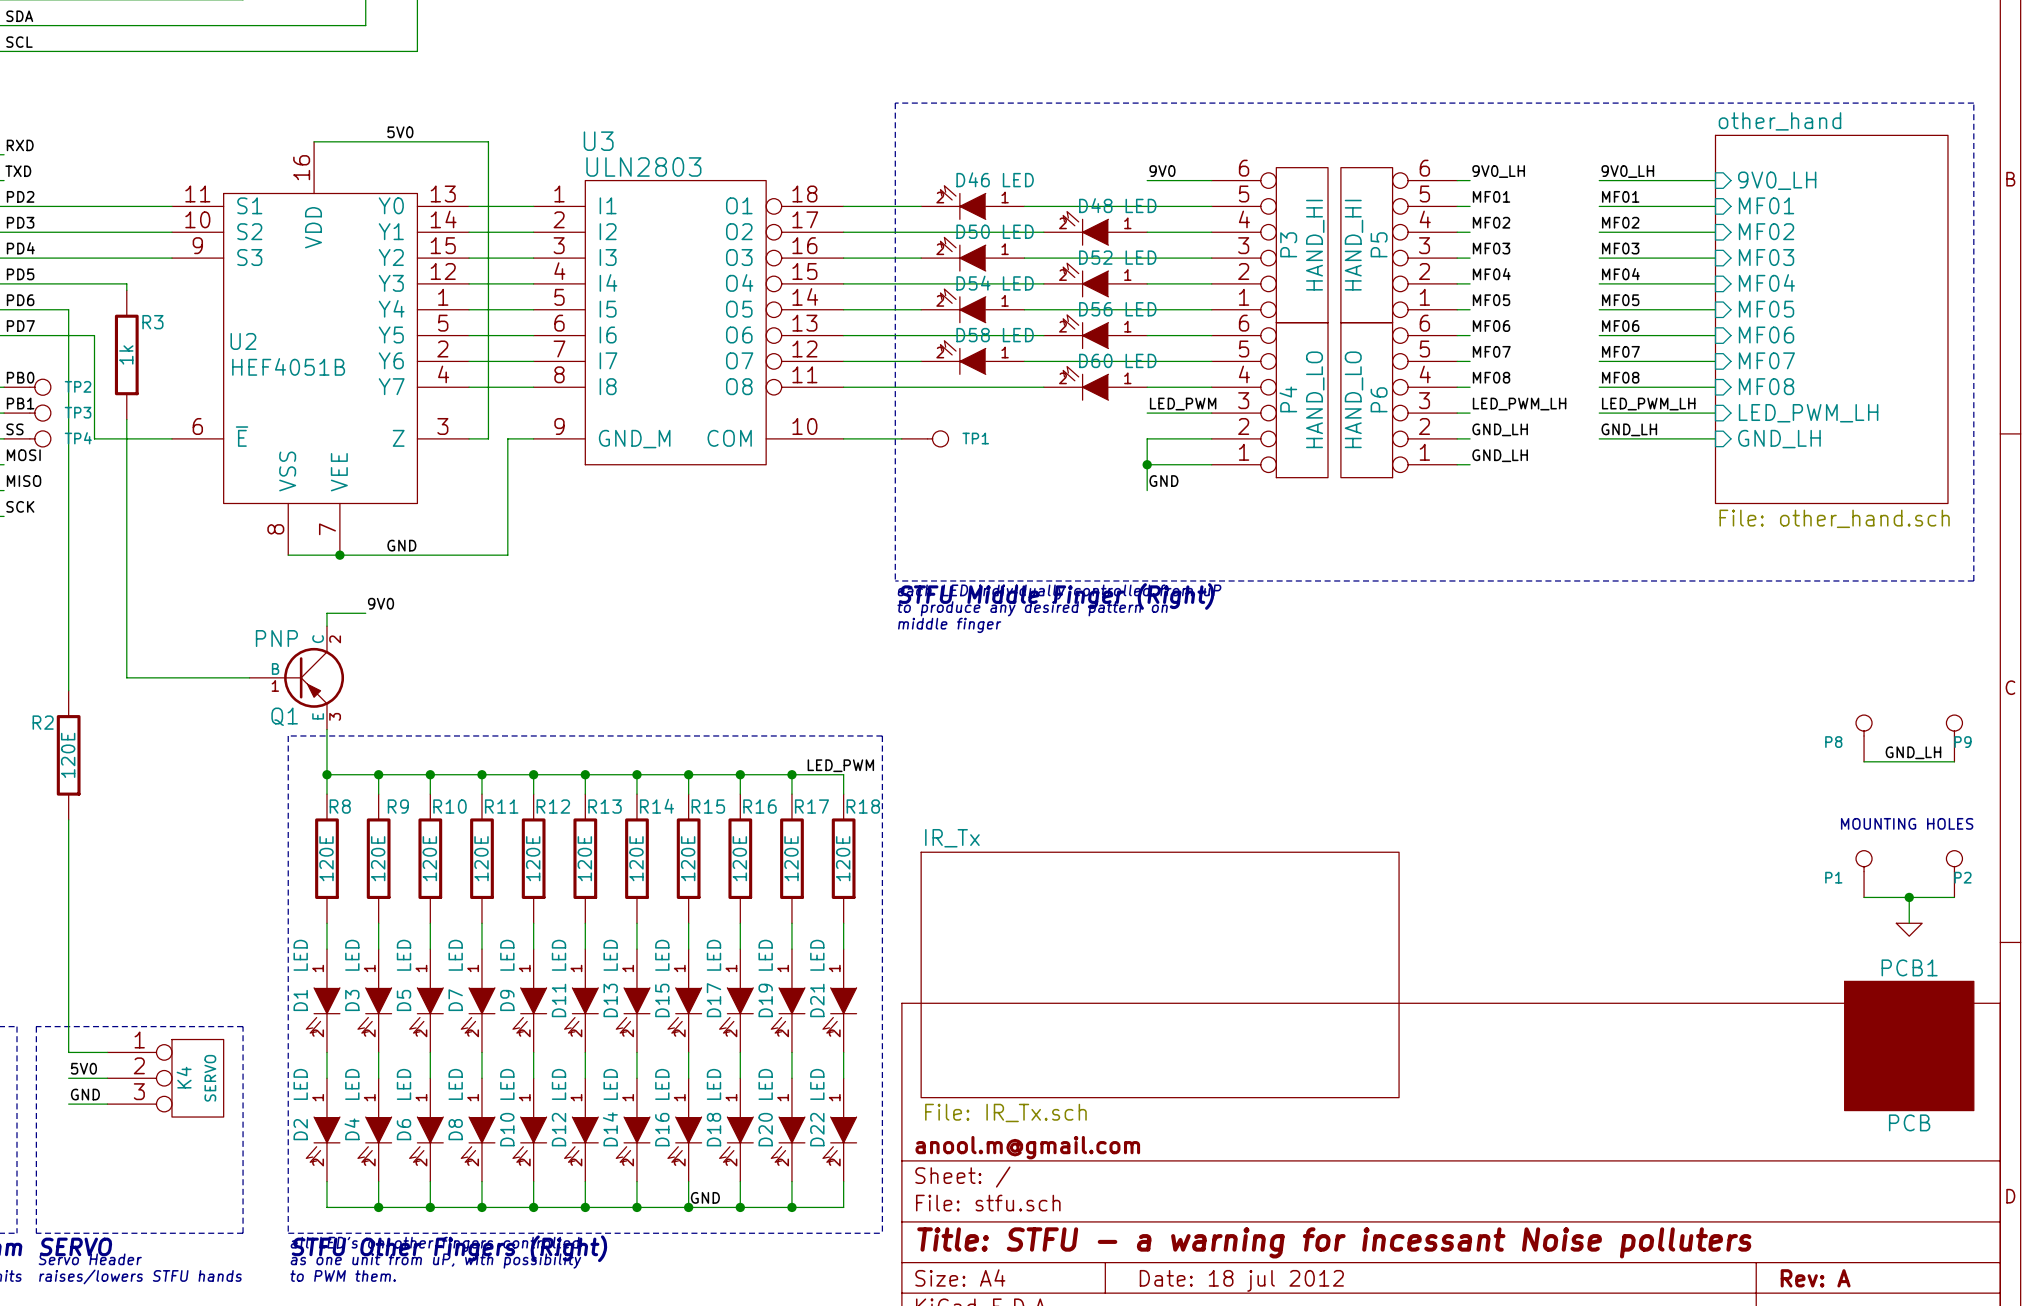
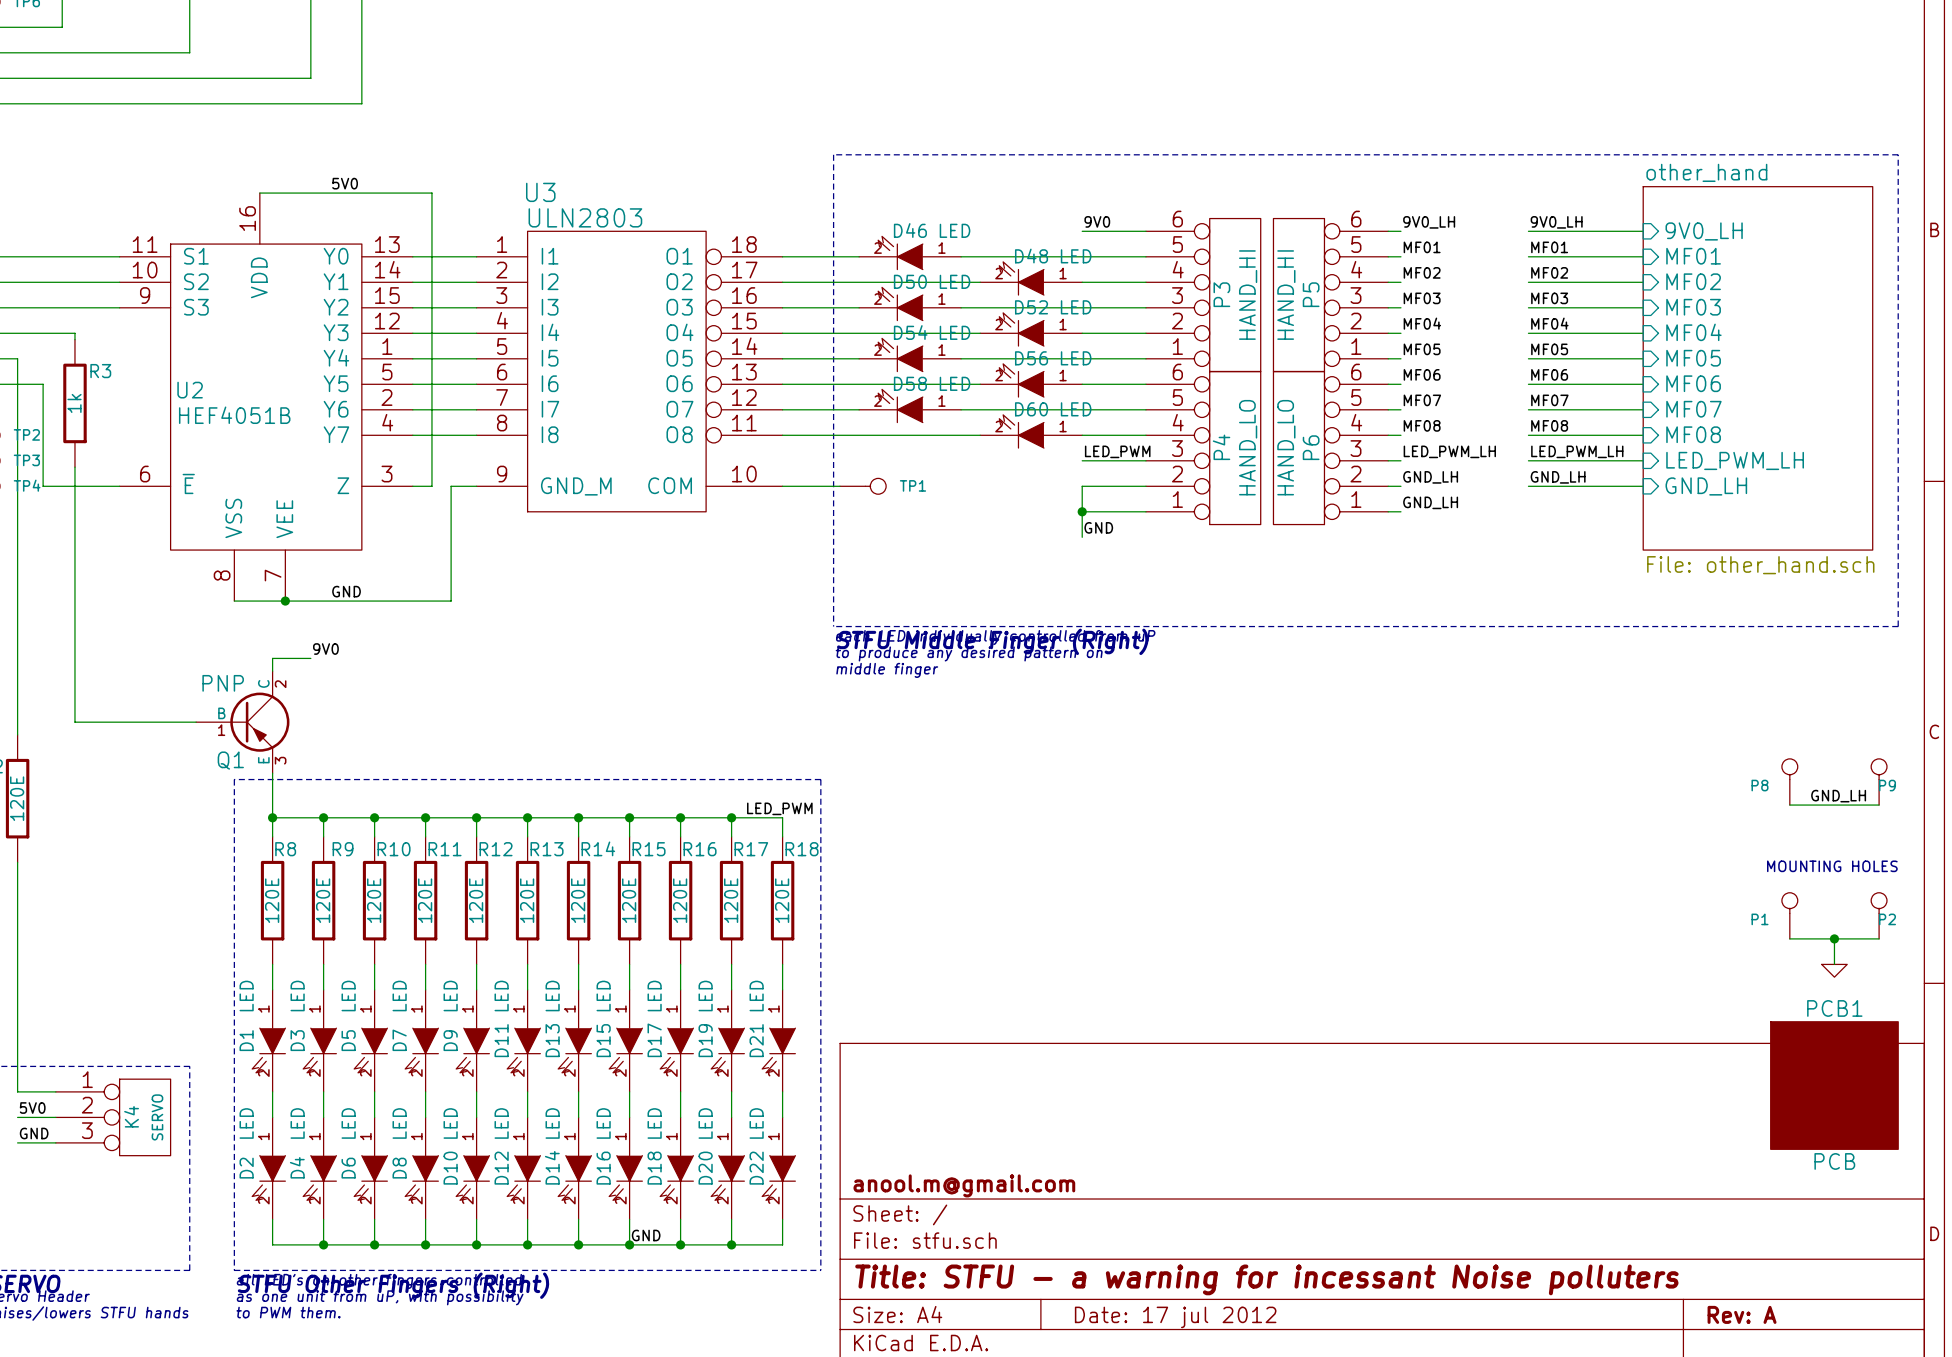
sheet IR_Tx: File: IR_Tx.sch (1160, 974) -> none
title block: Date: 18 jul 2012 (1241, 1280) -> Date: 17 jul 2012 (1175, 1317)

